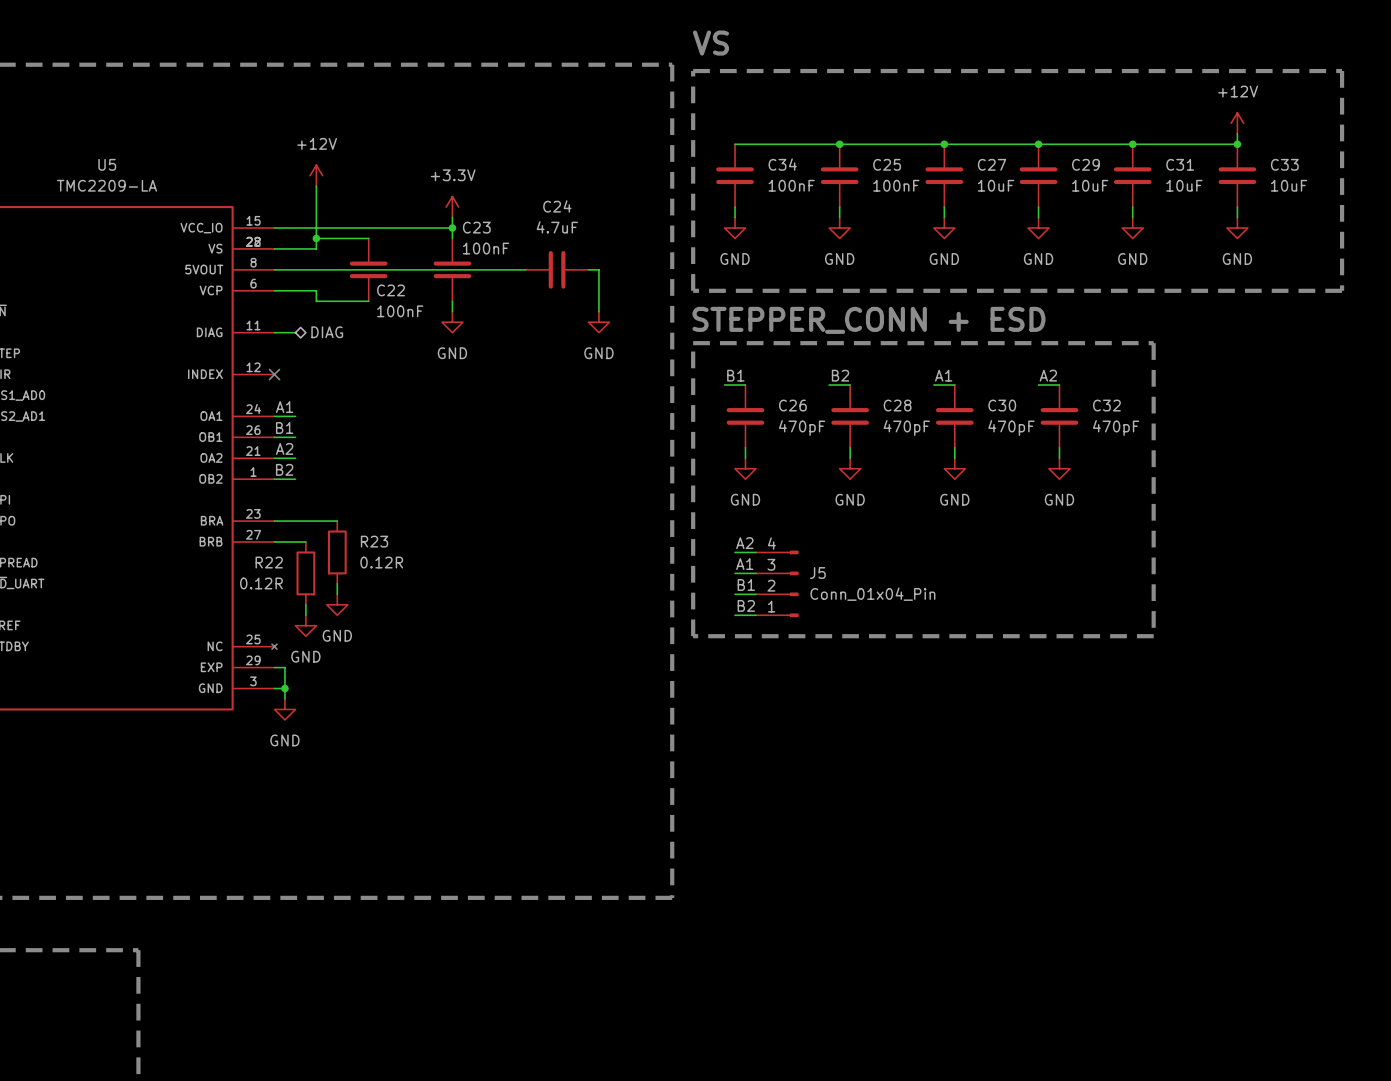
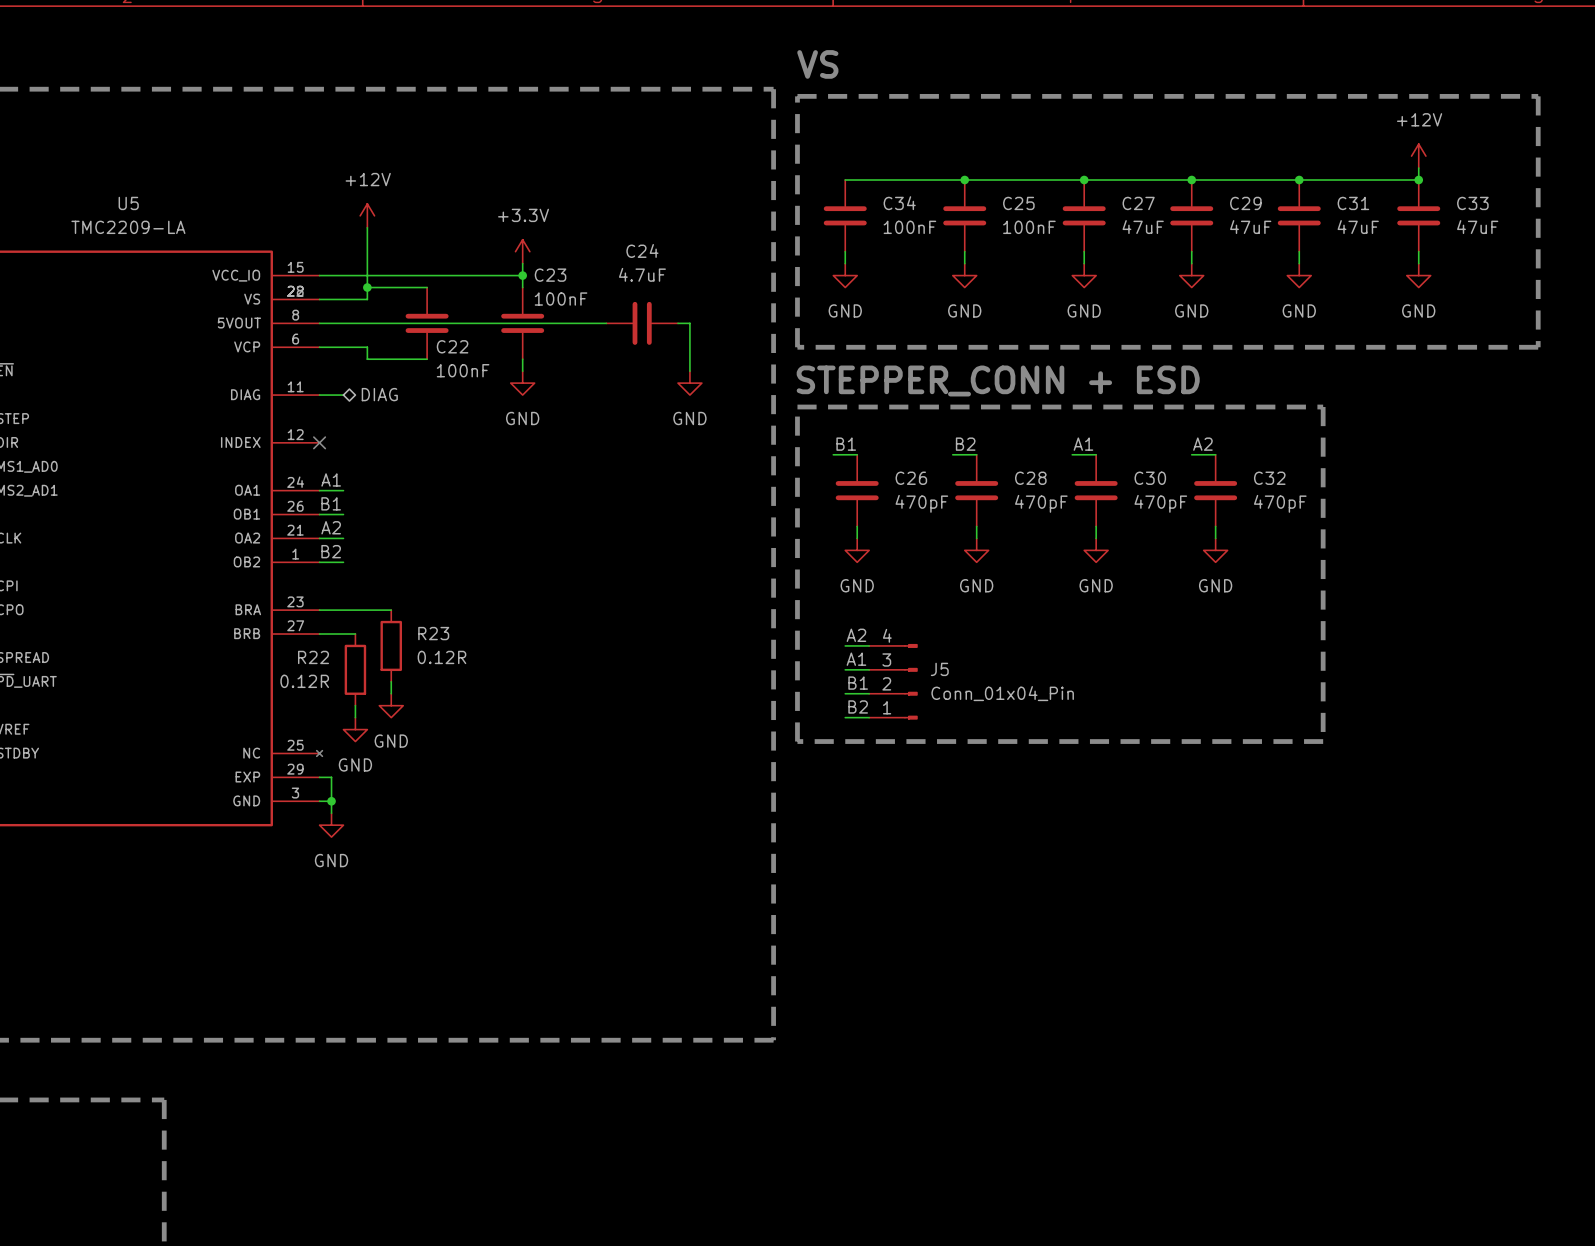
C27 value: 10uF (996, 185) -> 47uF (1143, 227)
C29 value: 10uF (1090, 185) -> 47uF (1250, 227)
C31 value: 10uF (1184, 185) -> 47uF (1358, 227)
C33 value: 10uF (1289, 185) -> 47uF (1477, 227)

